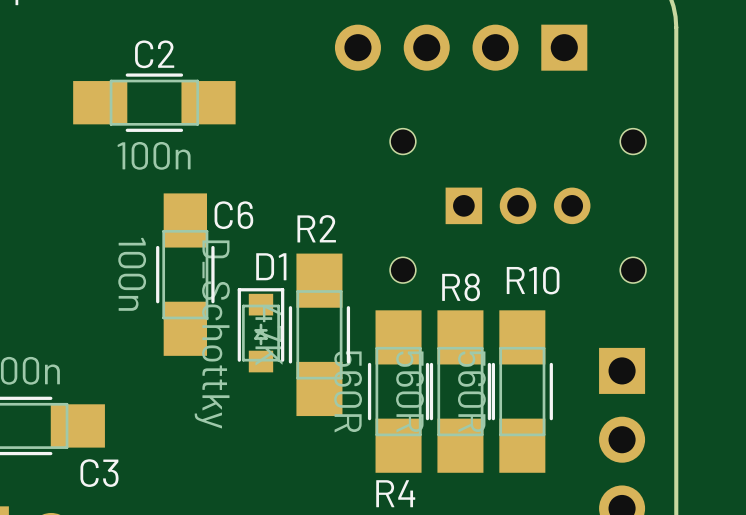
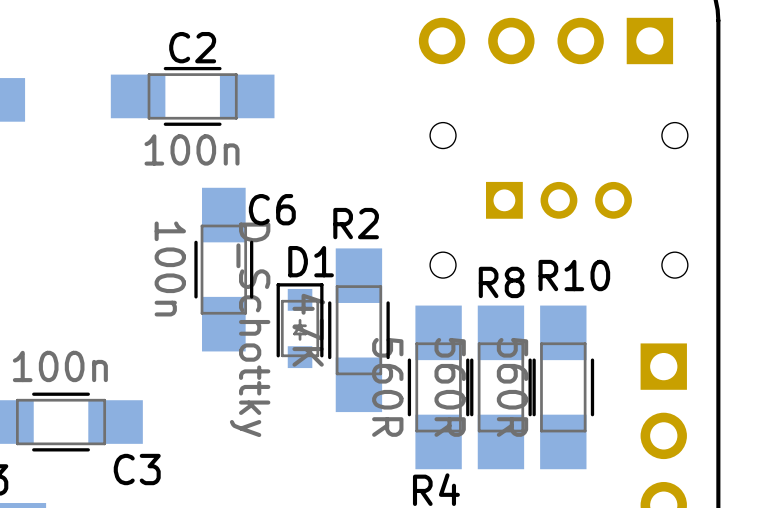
part position: (461, 47) -> (545, 40)

